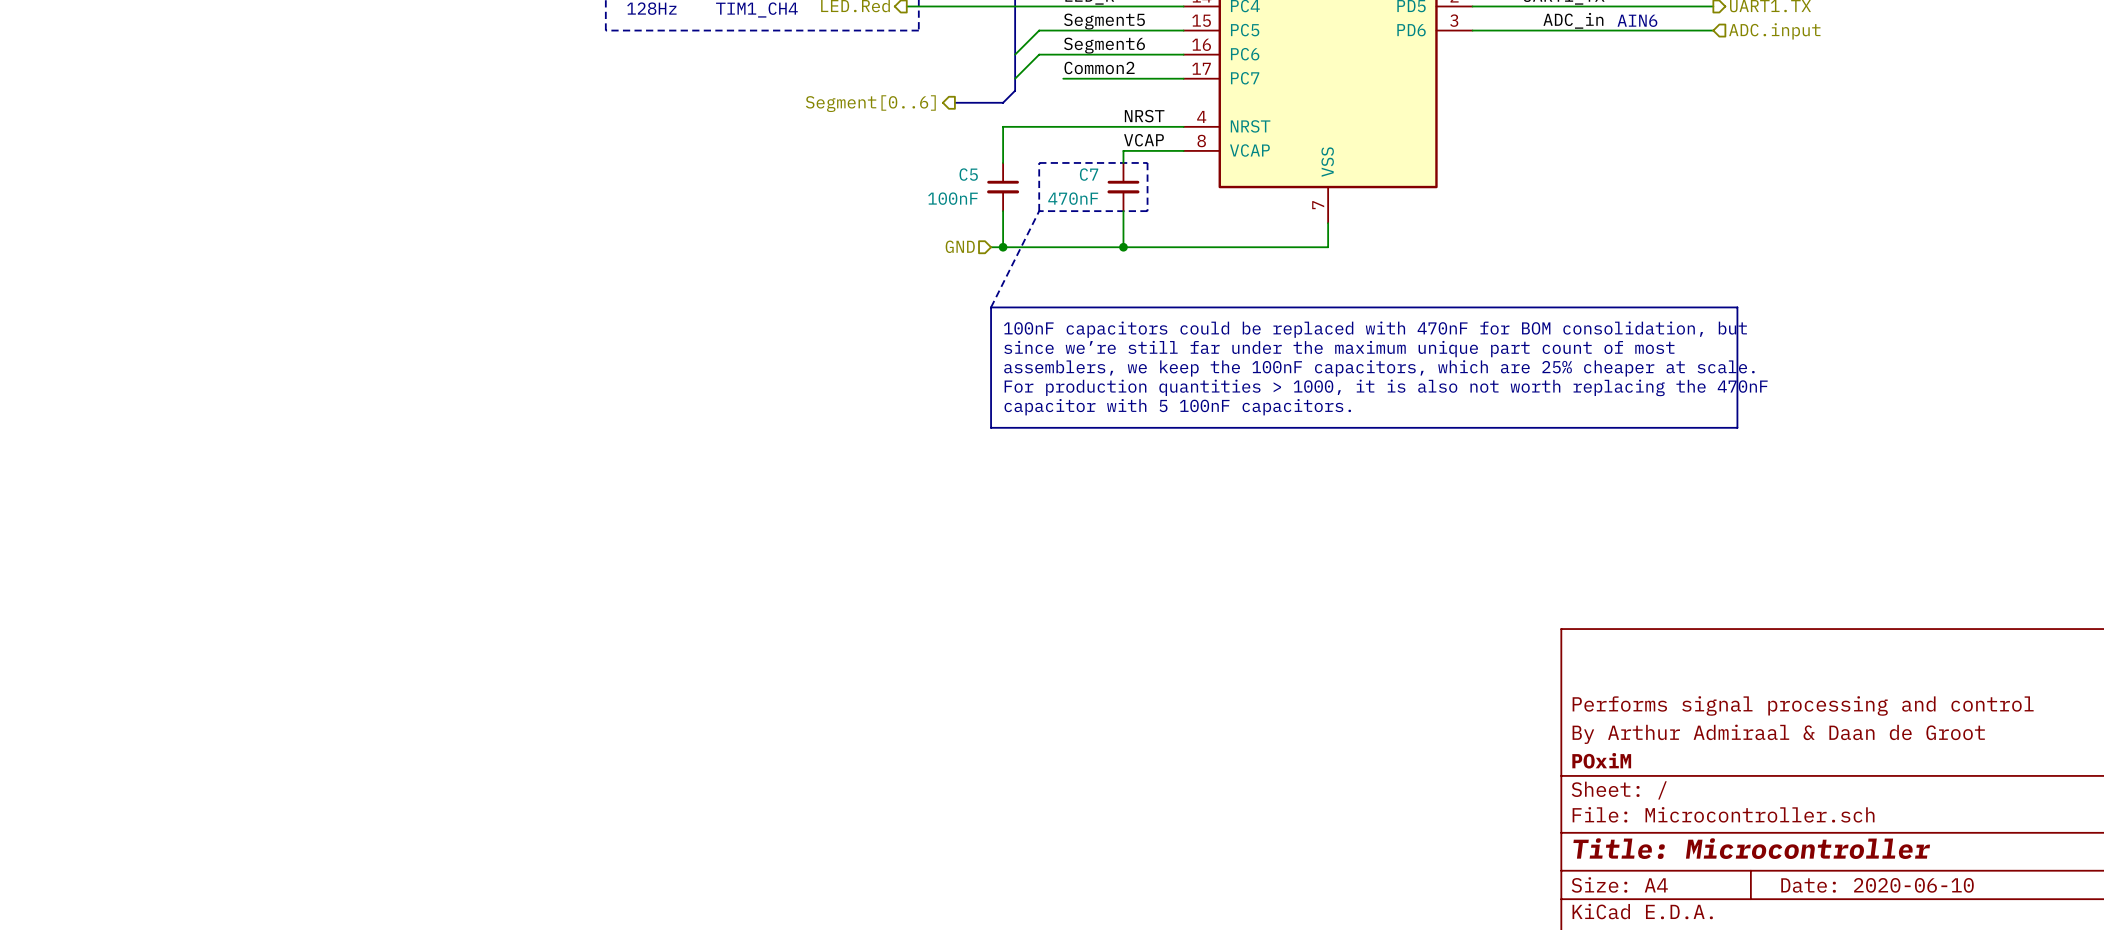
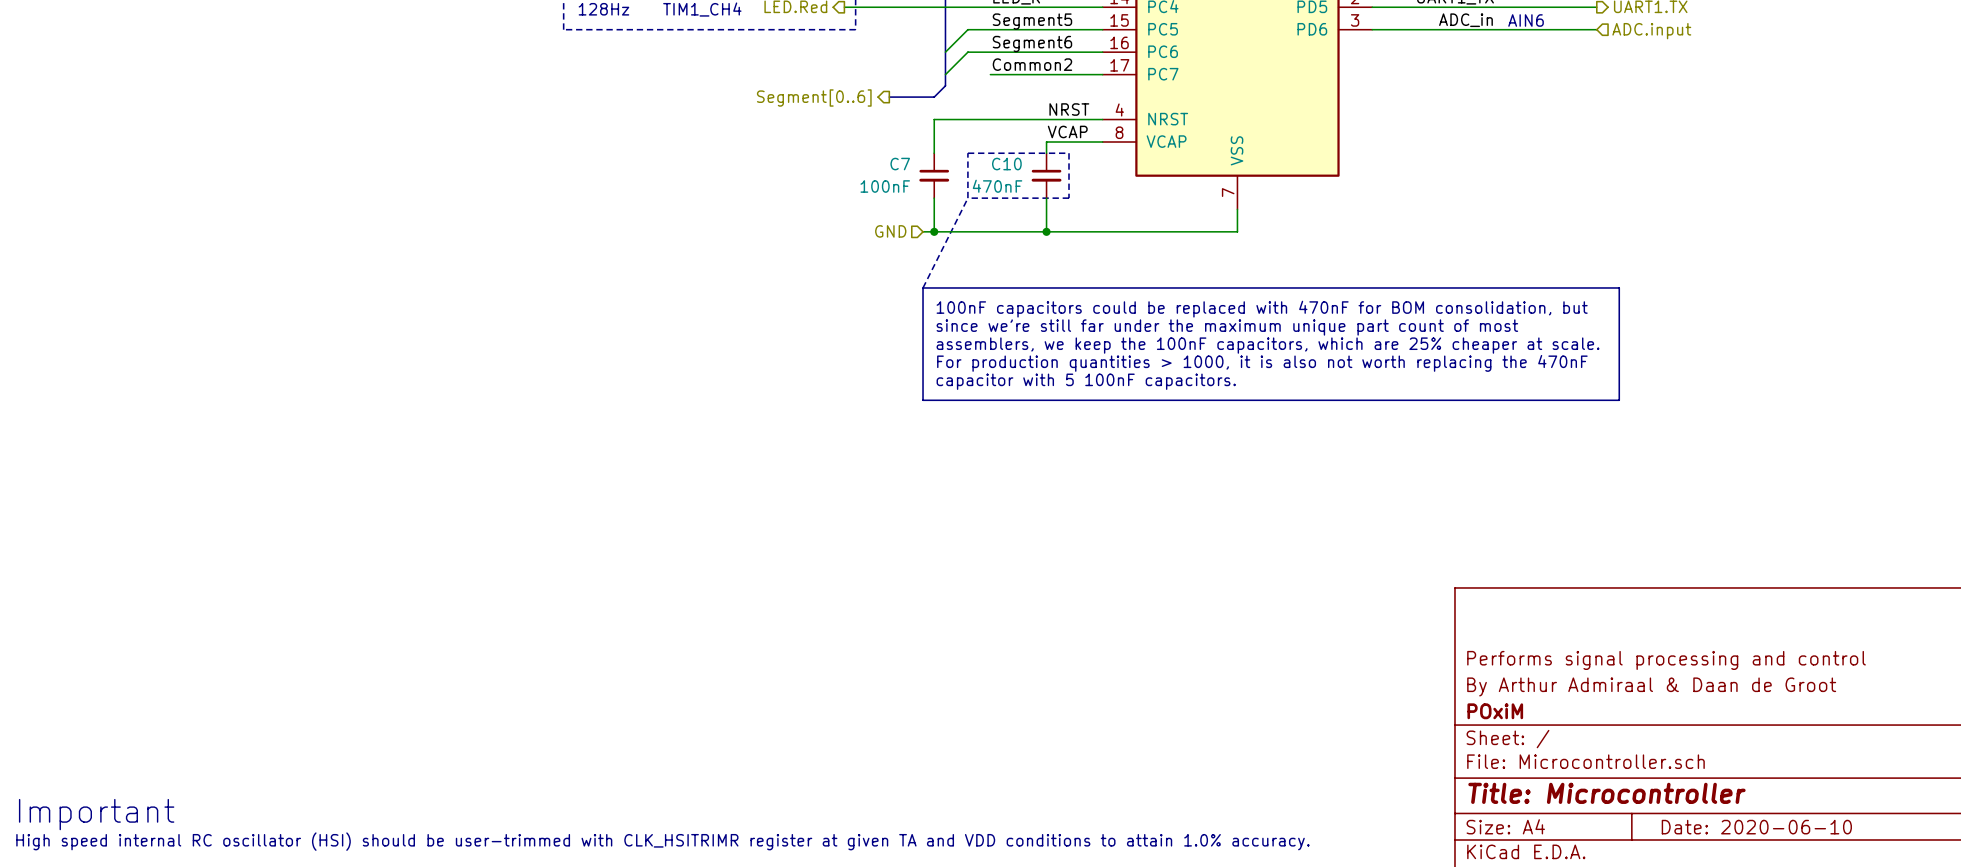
C5 name: C5 (968, 174) -> C7 (900, 164)
C7 name: C7 (1089, 174) -> C10 (1006, 164)
text: none -> Important (96, 814)
text: none -> High speed internal RC oscillator (HSI) should be user-trimmed with CLK_HSITRIMR register at given TA and VDD conditions to attain 1.0% accuracy. (662, 841)

